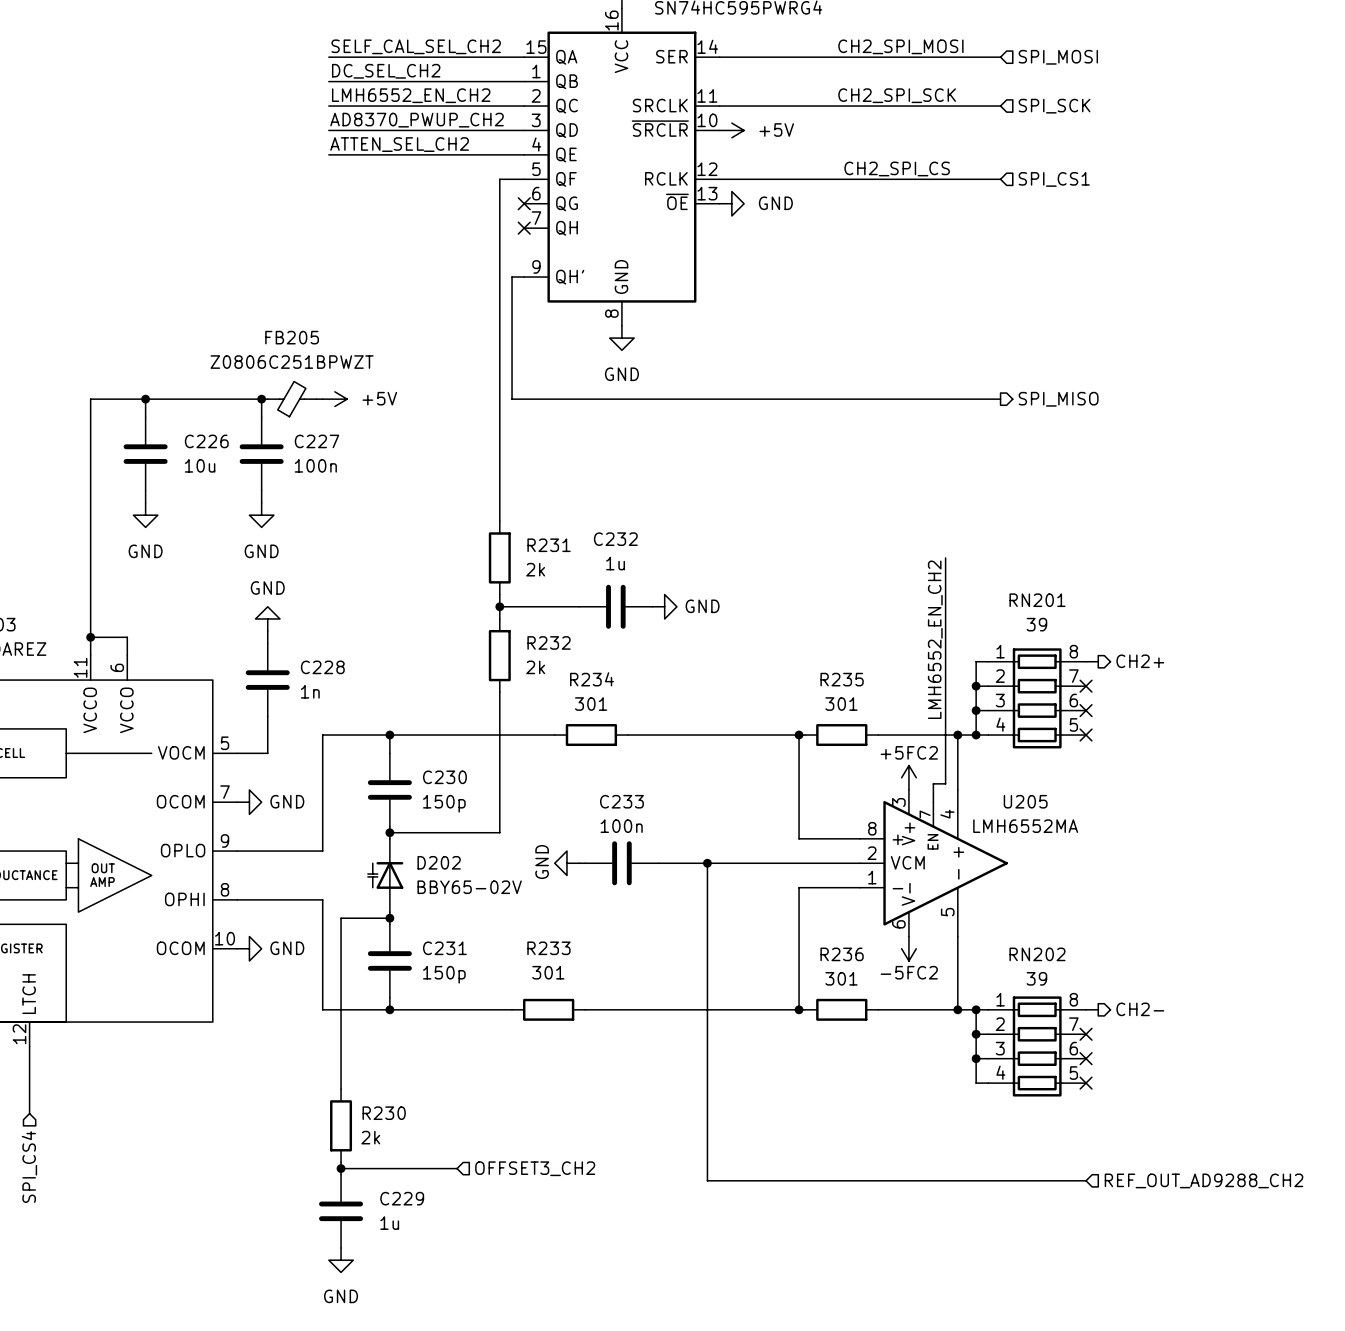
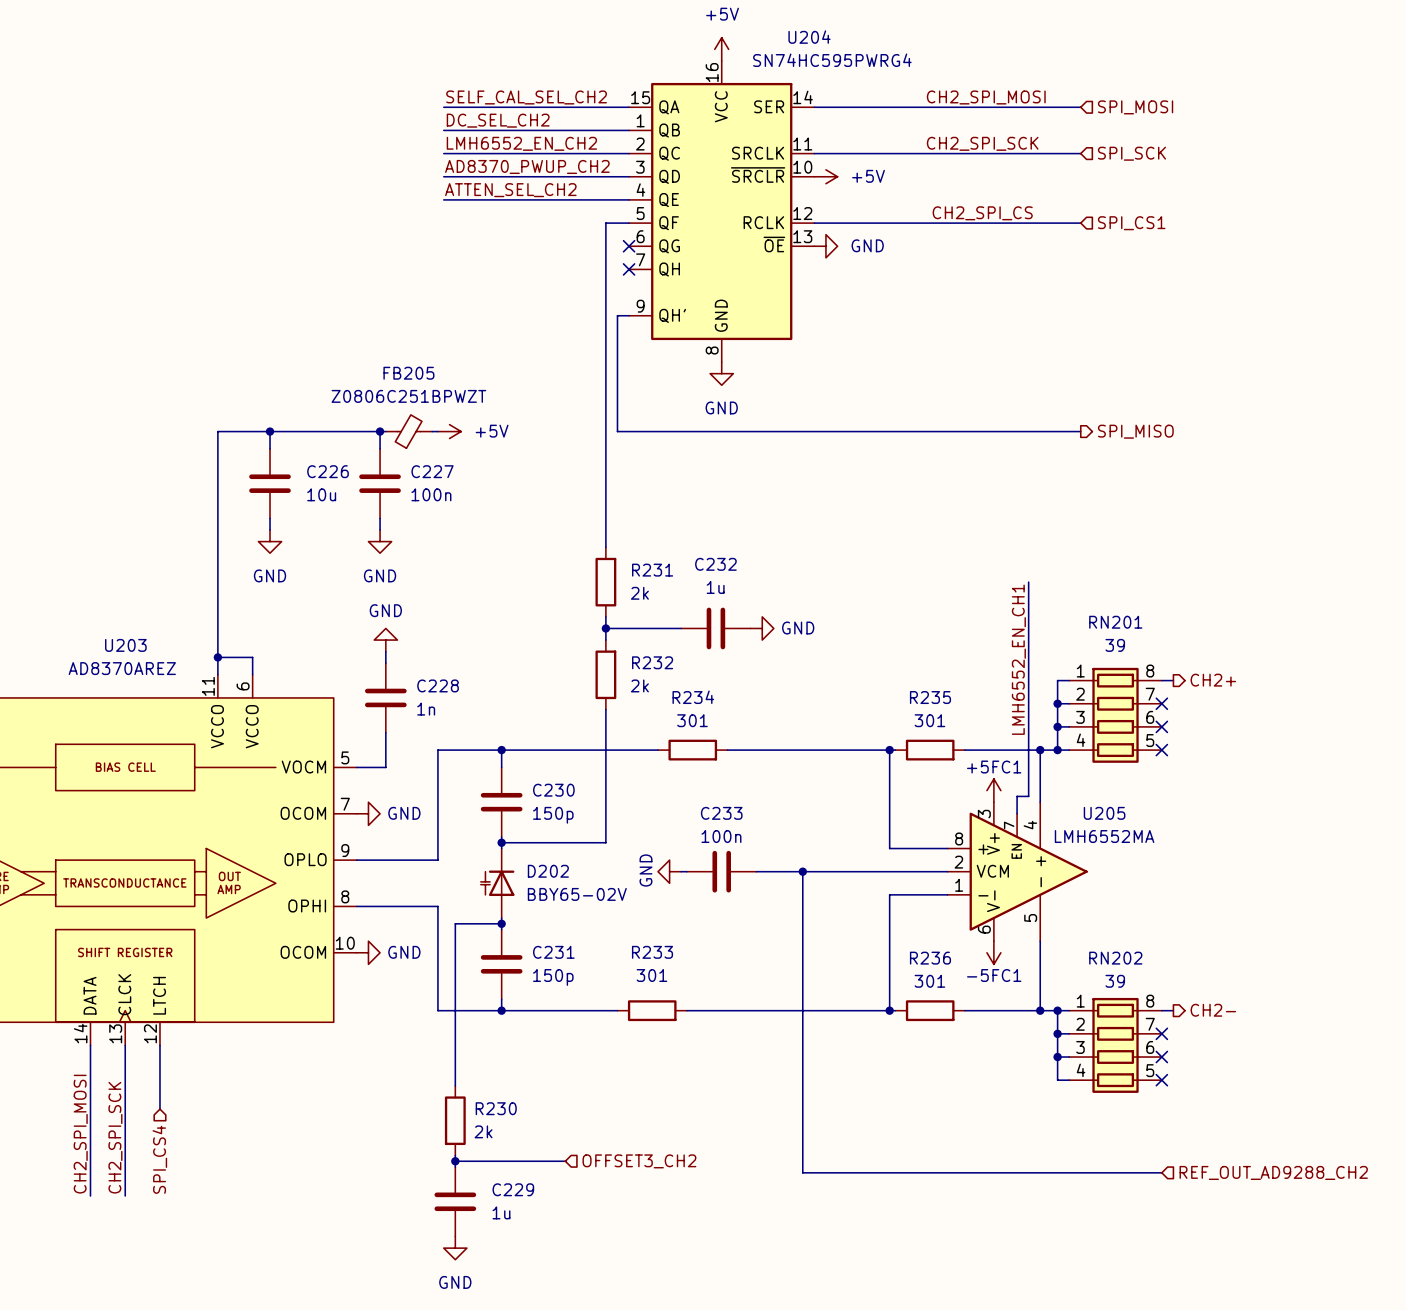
label: LMH6552_EN_CH2 (935, 639) -> LMH6552_EN_CH1 (1018, 659)
power symbol: +5FC2 (908, 777) -> +5FC1 (993, 790)
power symbol: -5FC2 (908, 948) -> -5FC1 (993, 952)

